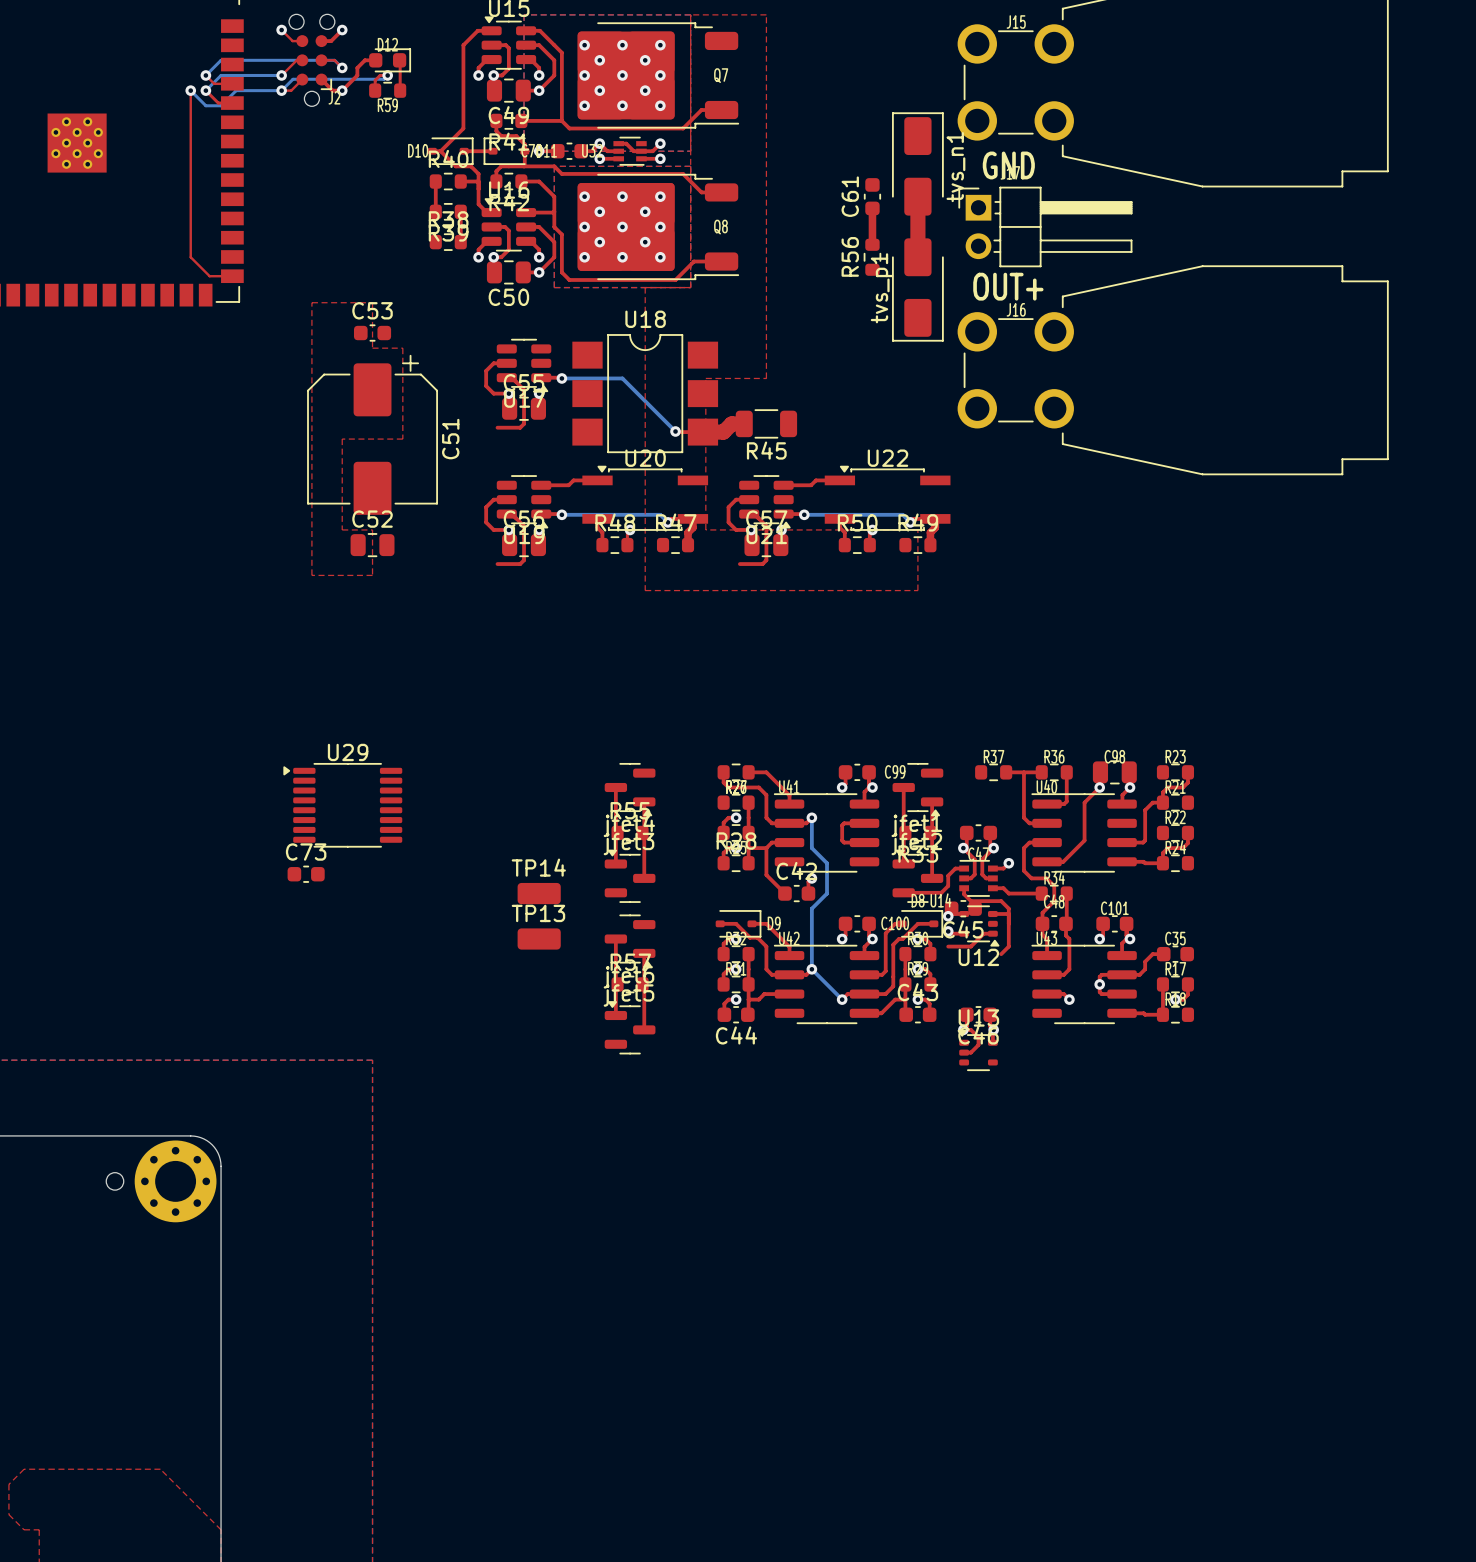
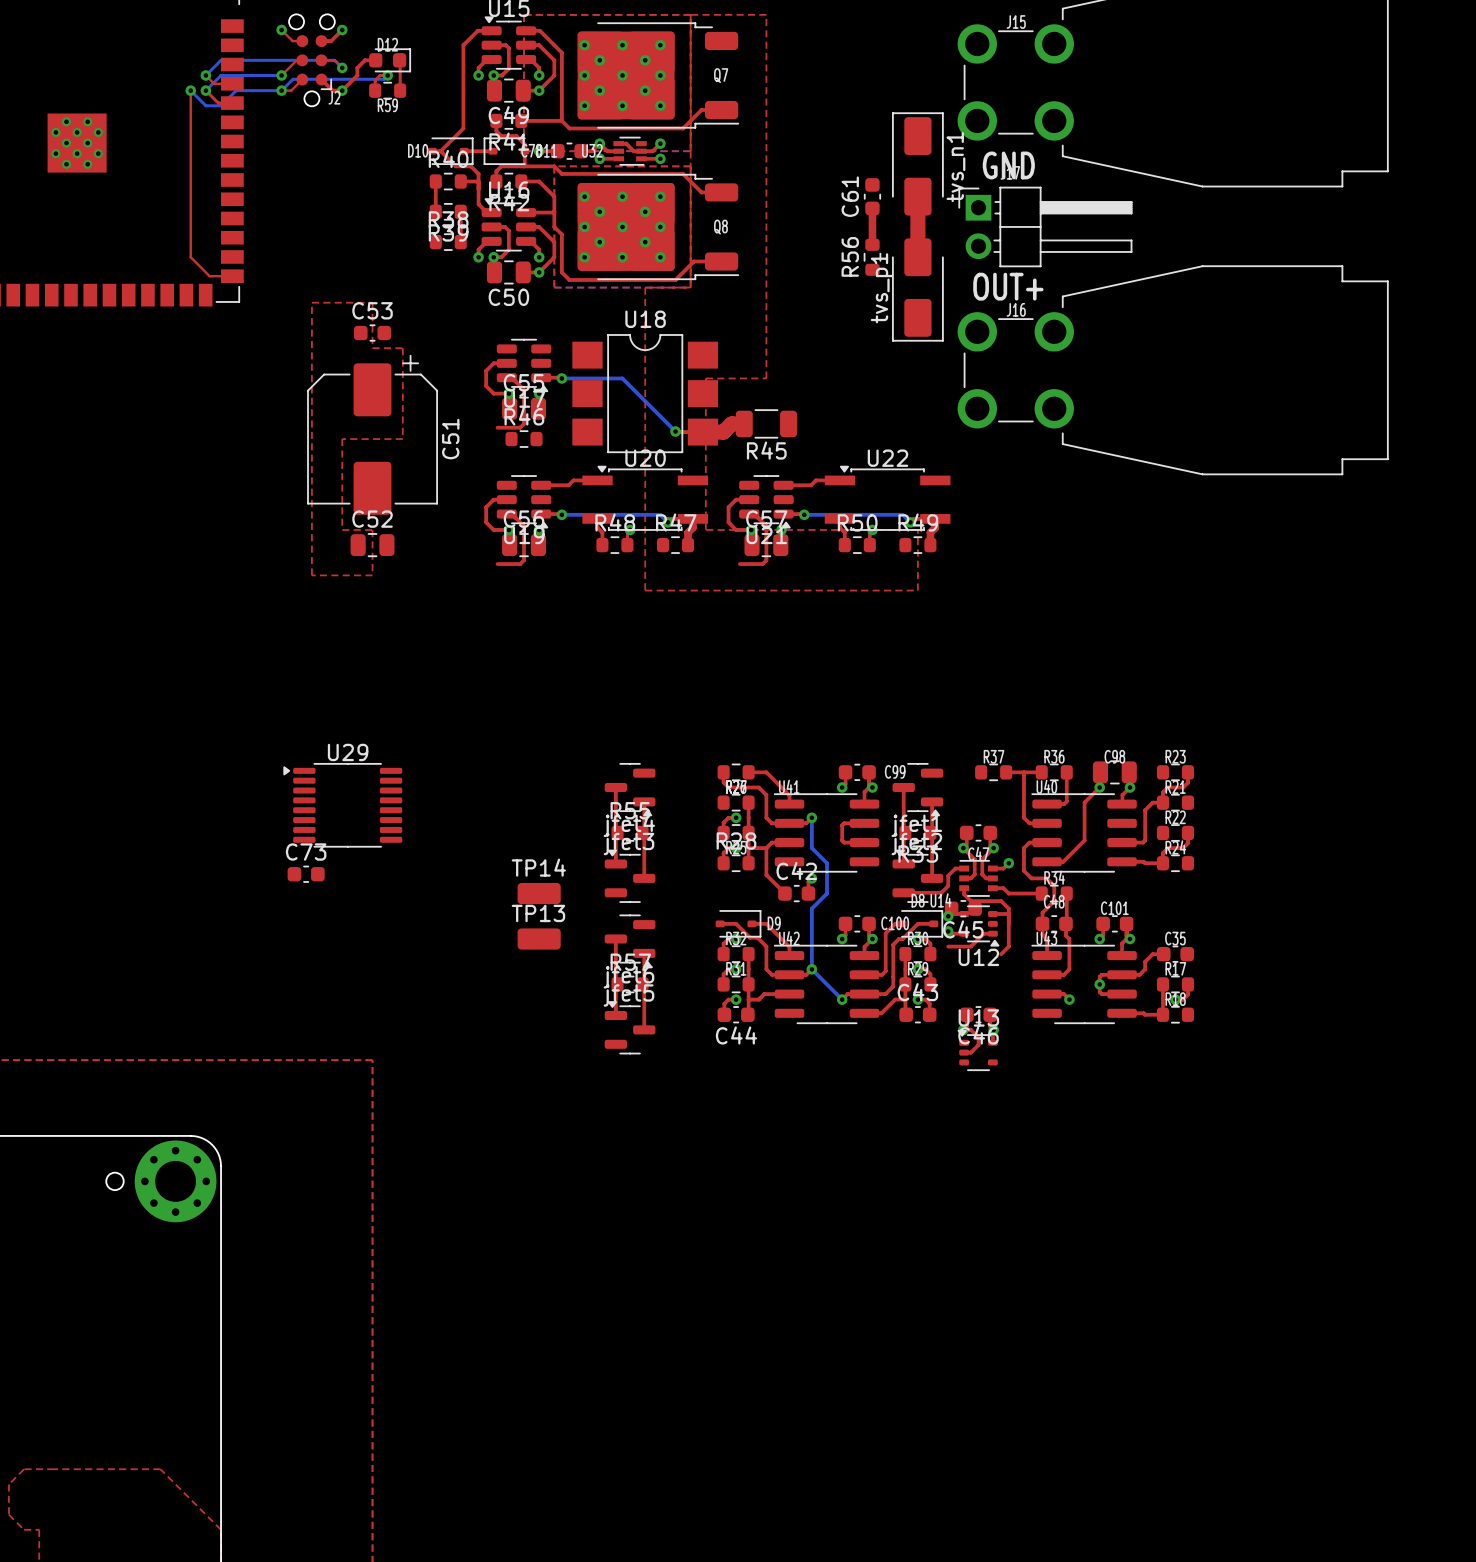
R46: none -> (524, 439)

